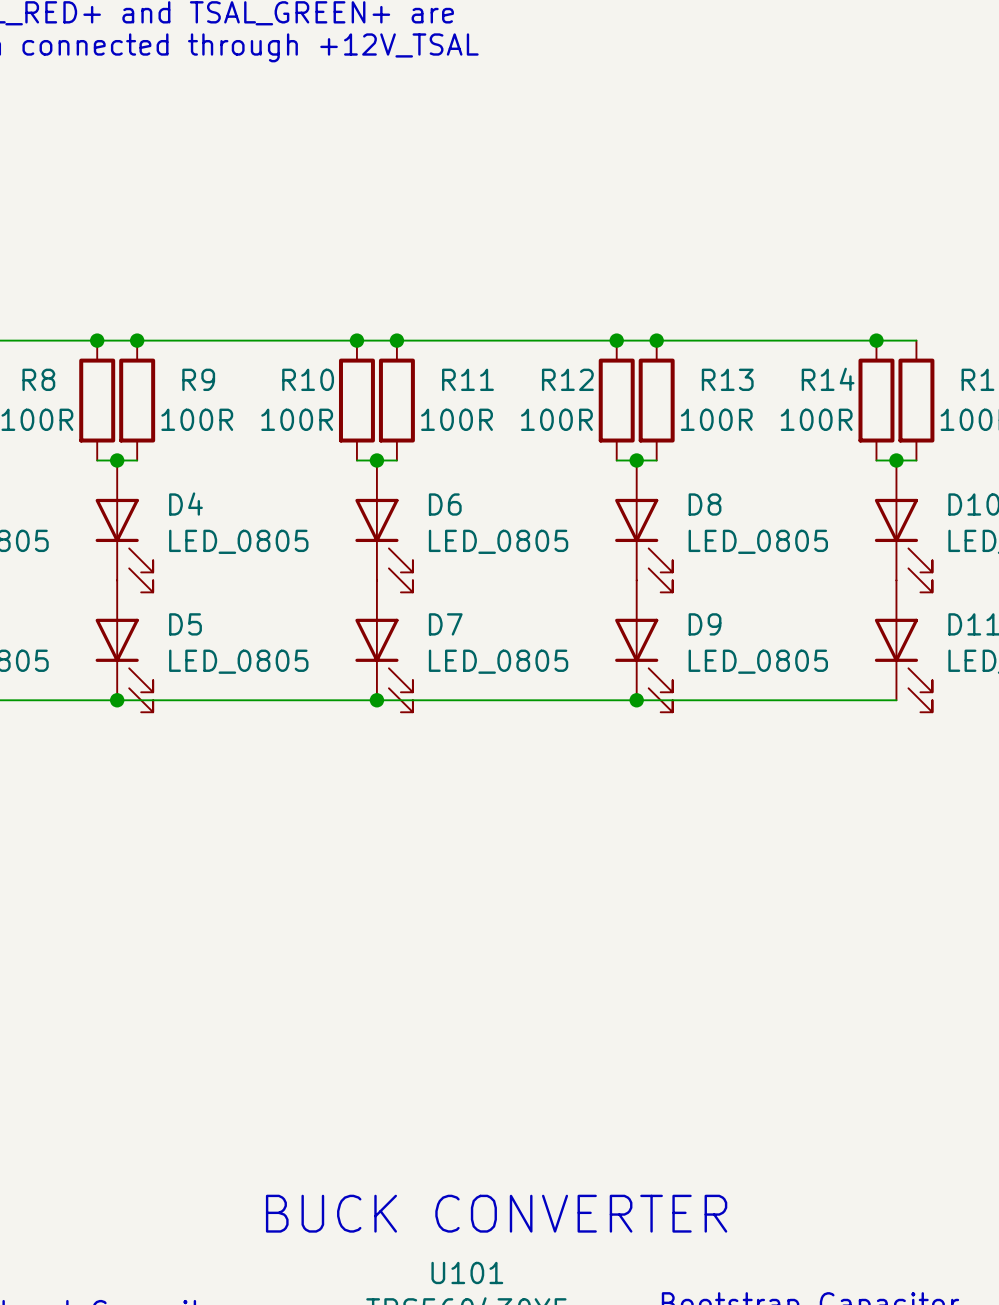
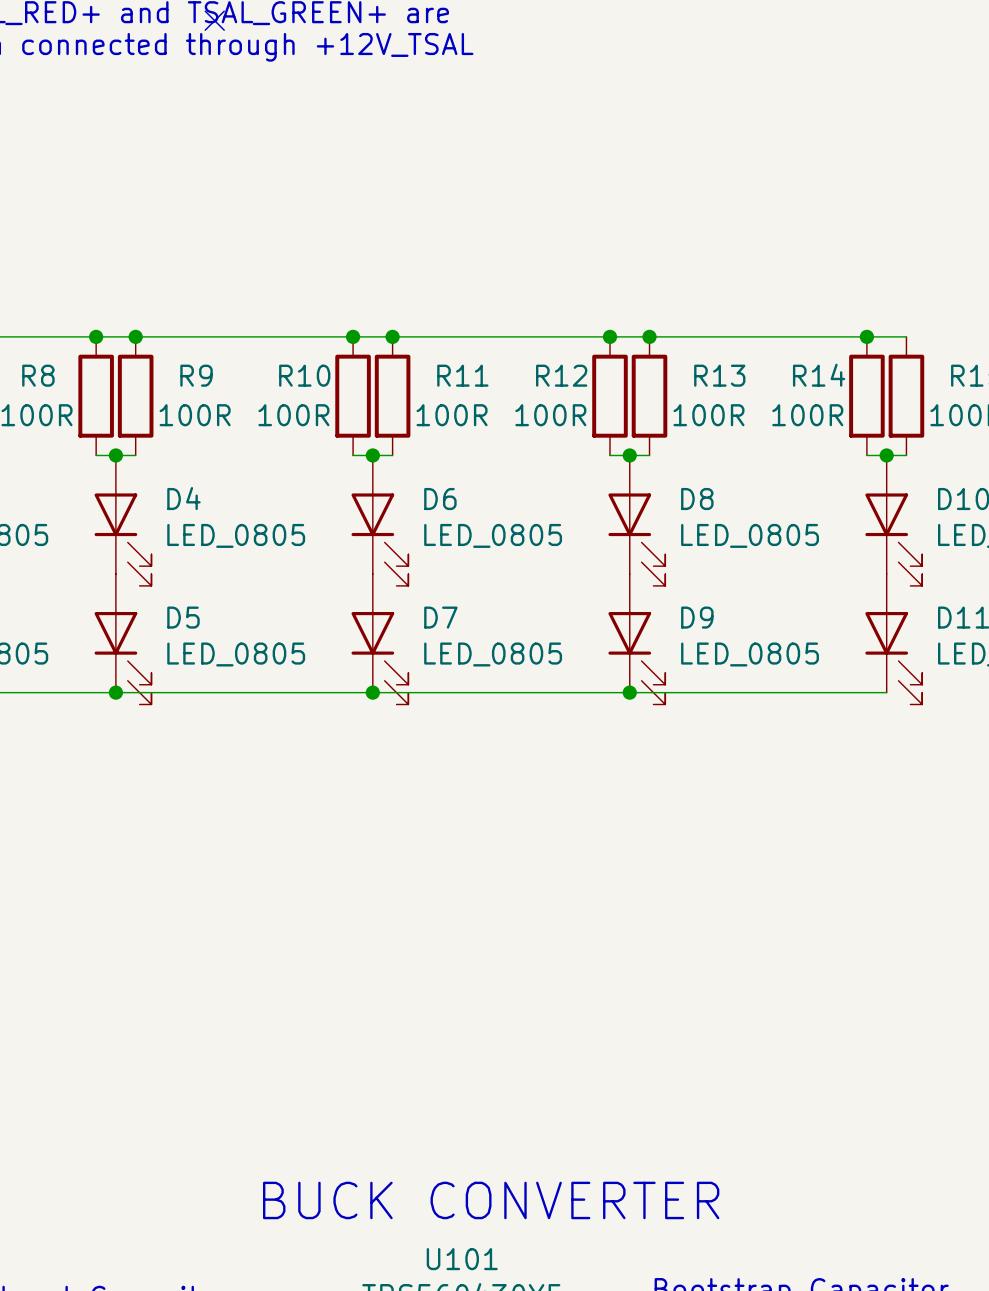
no-connect mark: none -> (214, 20)

